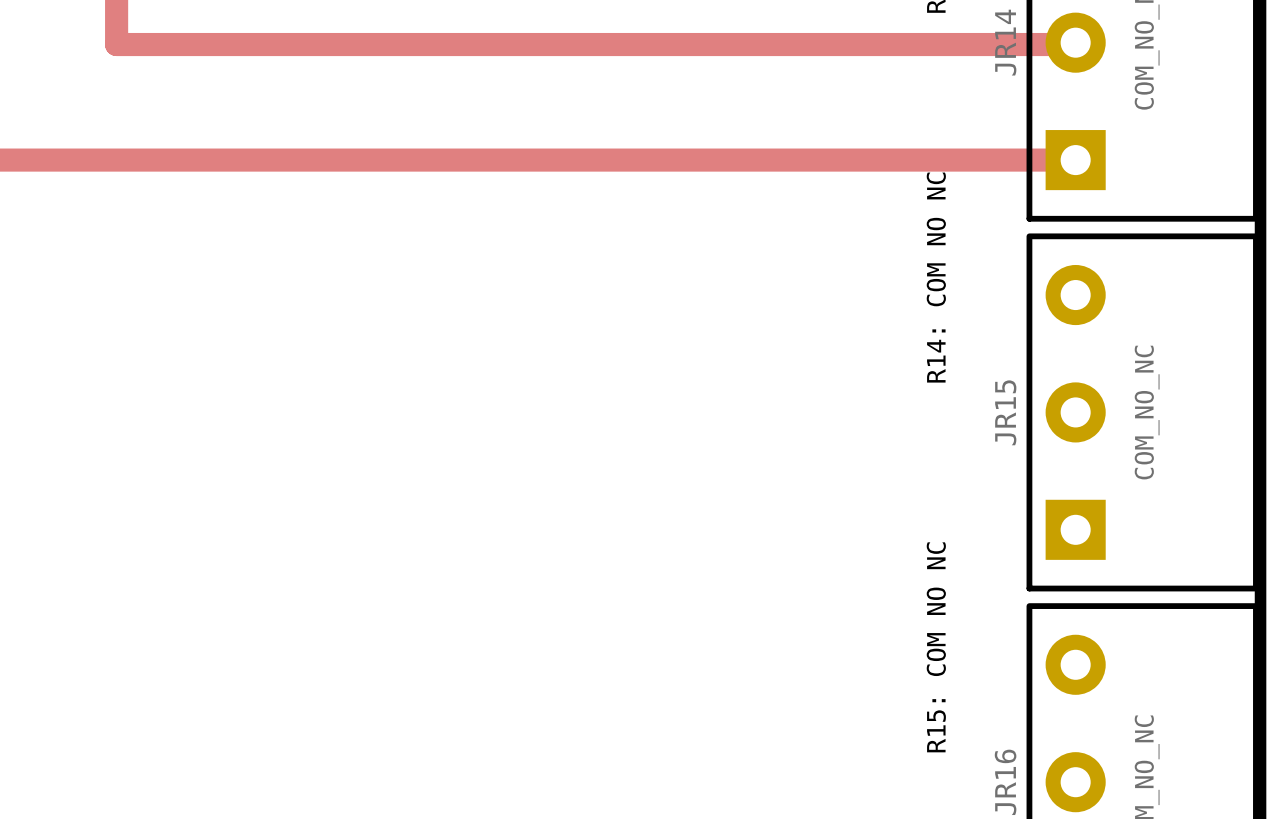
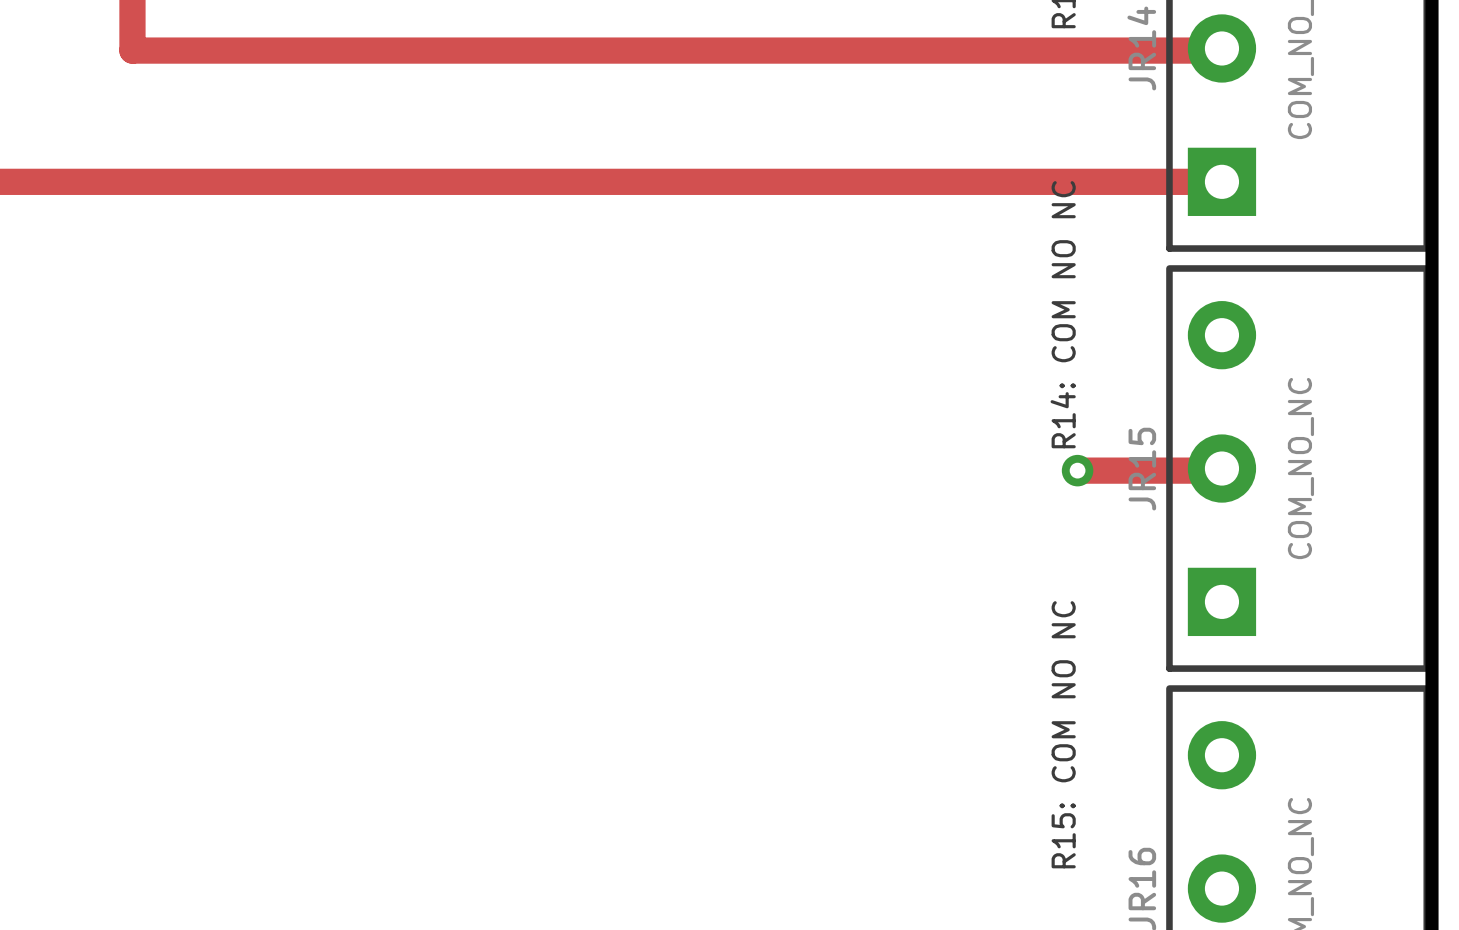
track: none -> (1077, 470) (1221, 470)
via: none -> (1077, 470)

